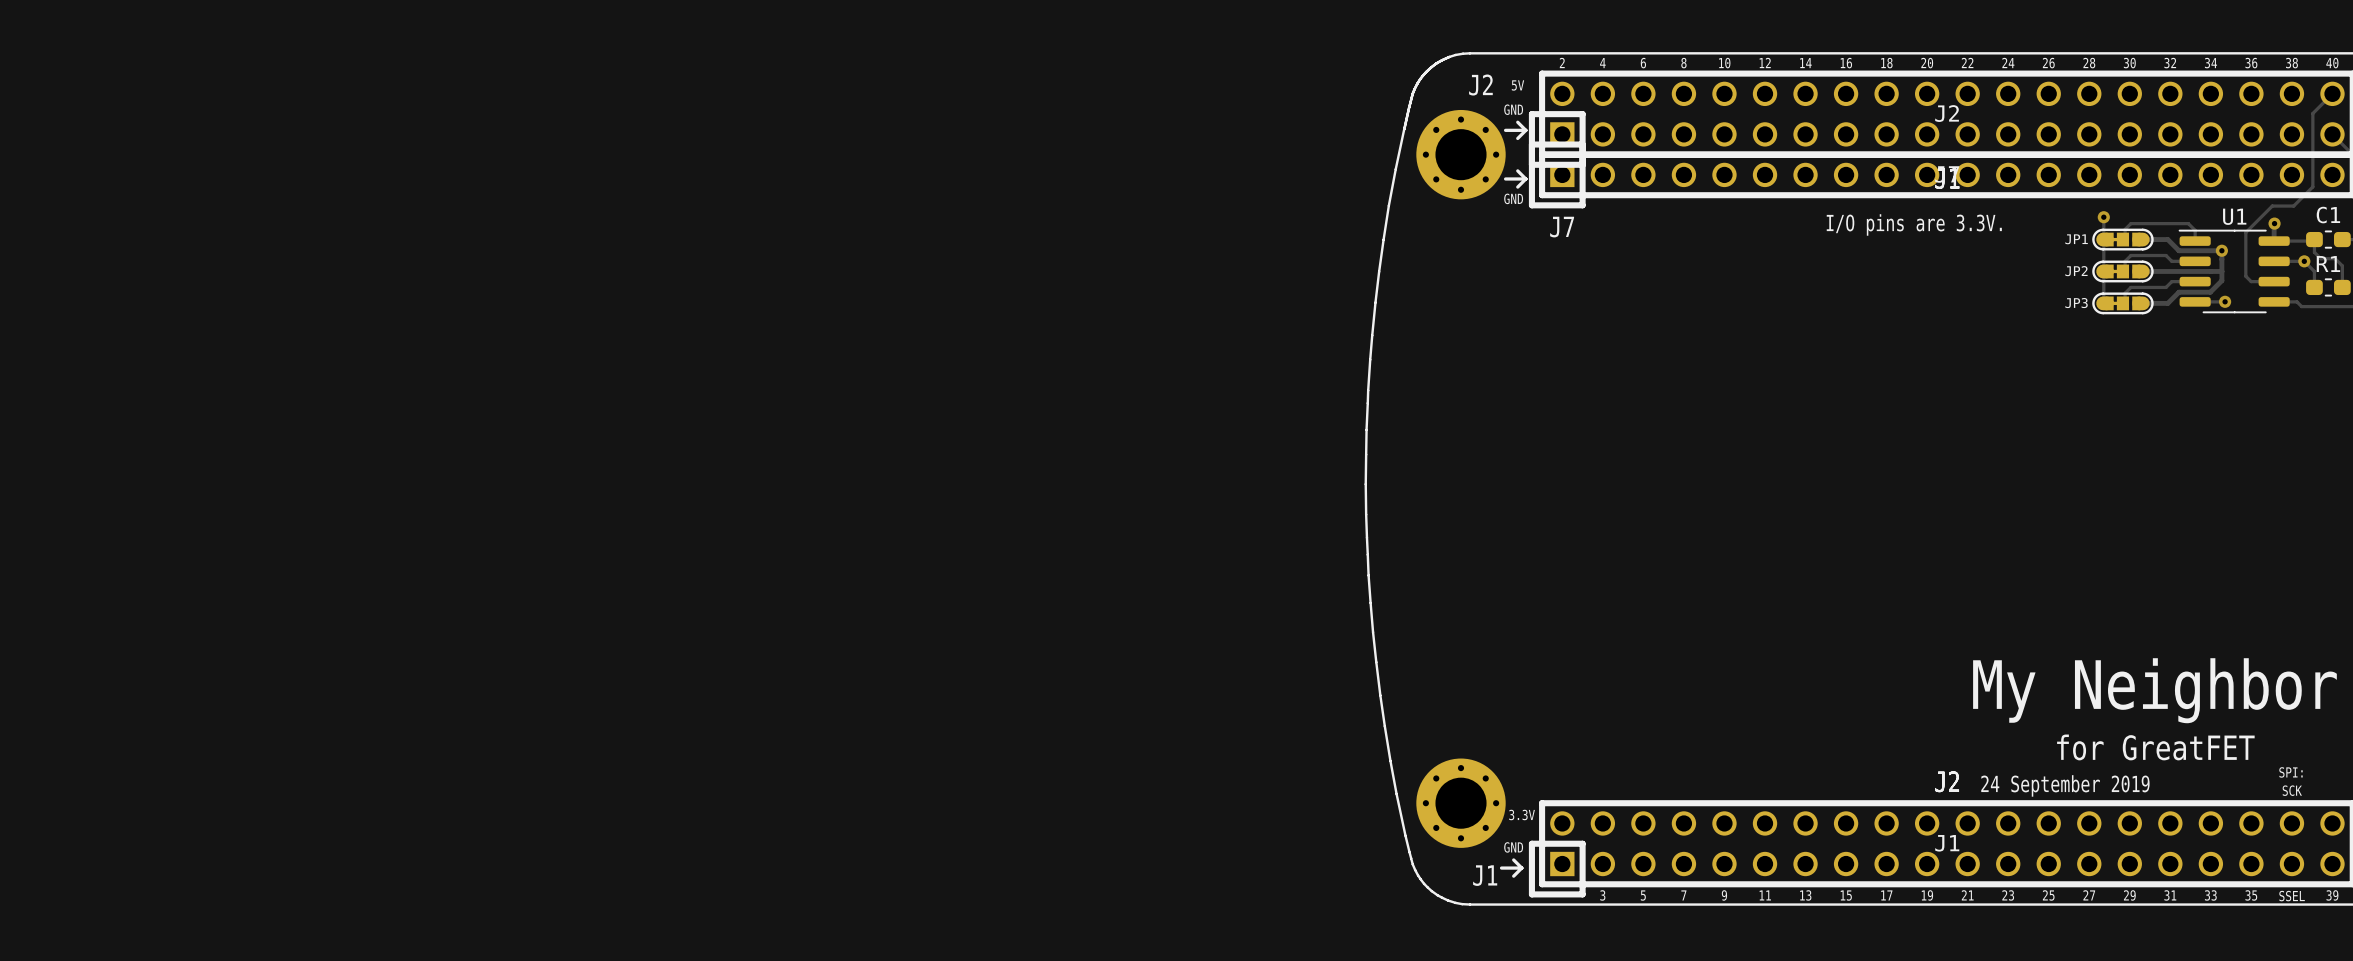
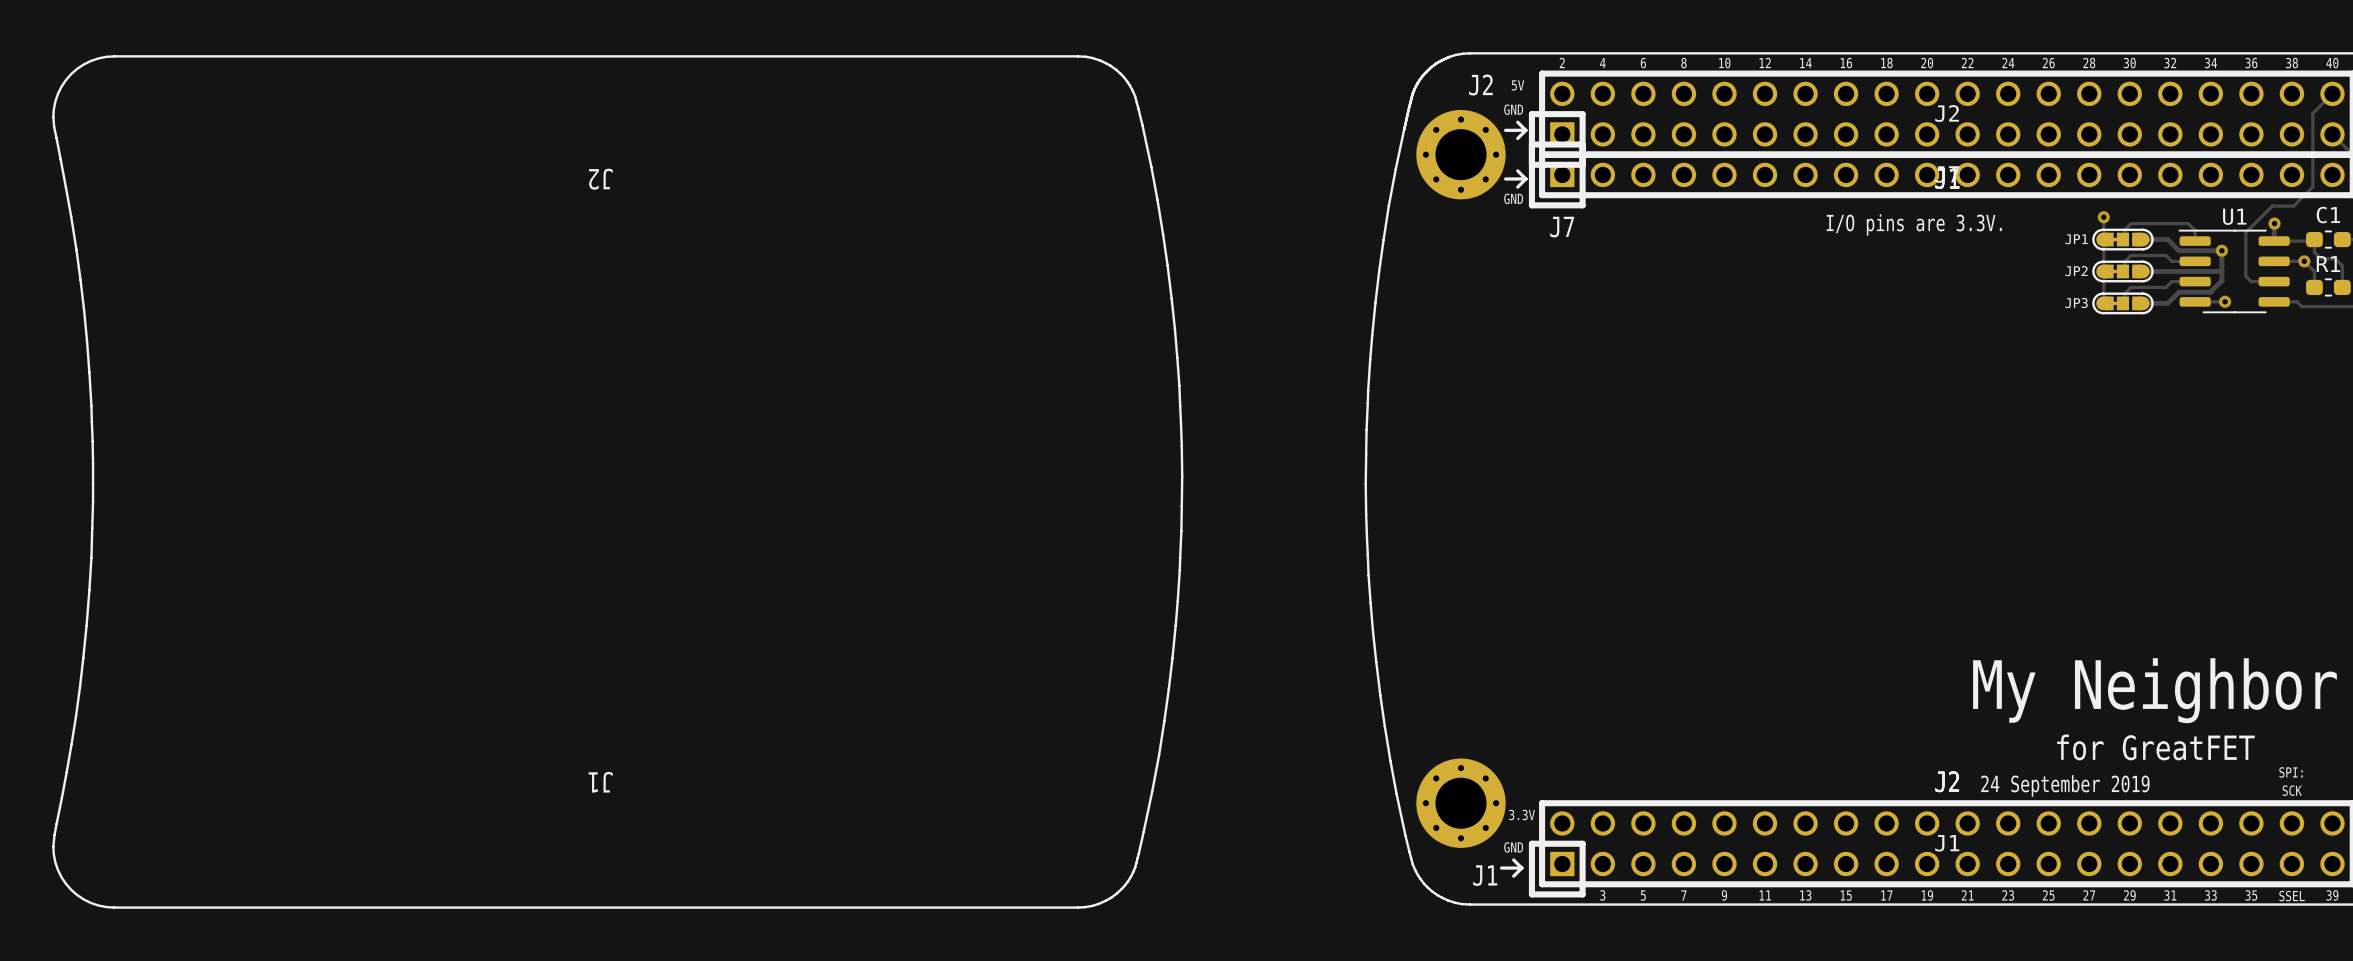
line: none -> (114, 56) (1078, 56) (1099, 60) (1116, 69) (1127, 81) (1135, 96) (1151, 167) (1163, 234) (1177, 357) (1182, 476) (1177, 601) (1164, 721) (1138, 853) (1133, 871) (1125, 885) (1105, 900) (1092, 905) (1078, 907) (114, 907) (90, 902) (77, 895) (61, 877) (55, 862) (53, 846) (76, 716) (86, 625) (91, 557) (92, 441) (89, 372) (80, 279) (53, 117) (57, 93) (71, 74) (90, 60) (114, 56)
text: none -> J2 (600, 179)
text: none -> J1 (600, 782)

